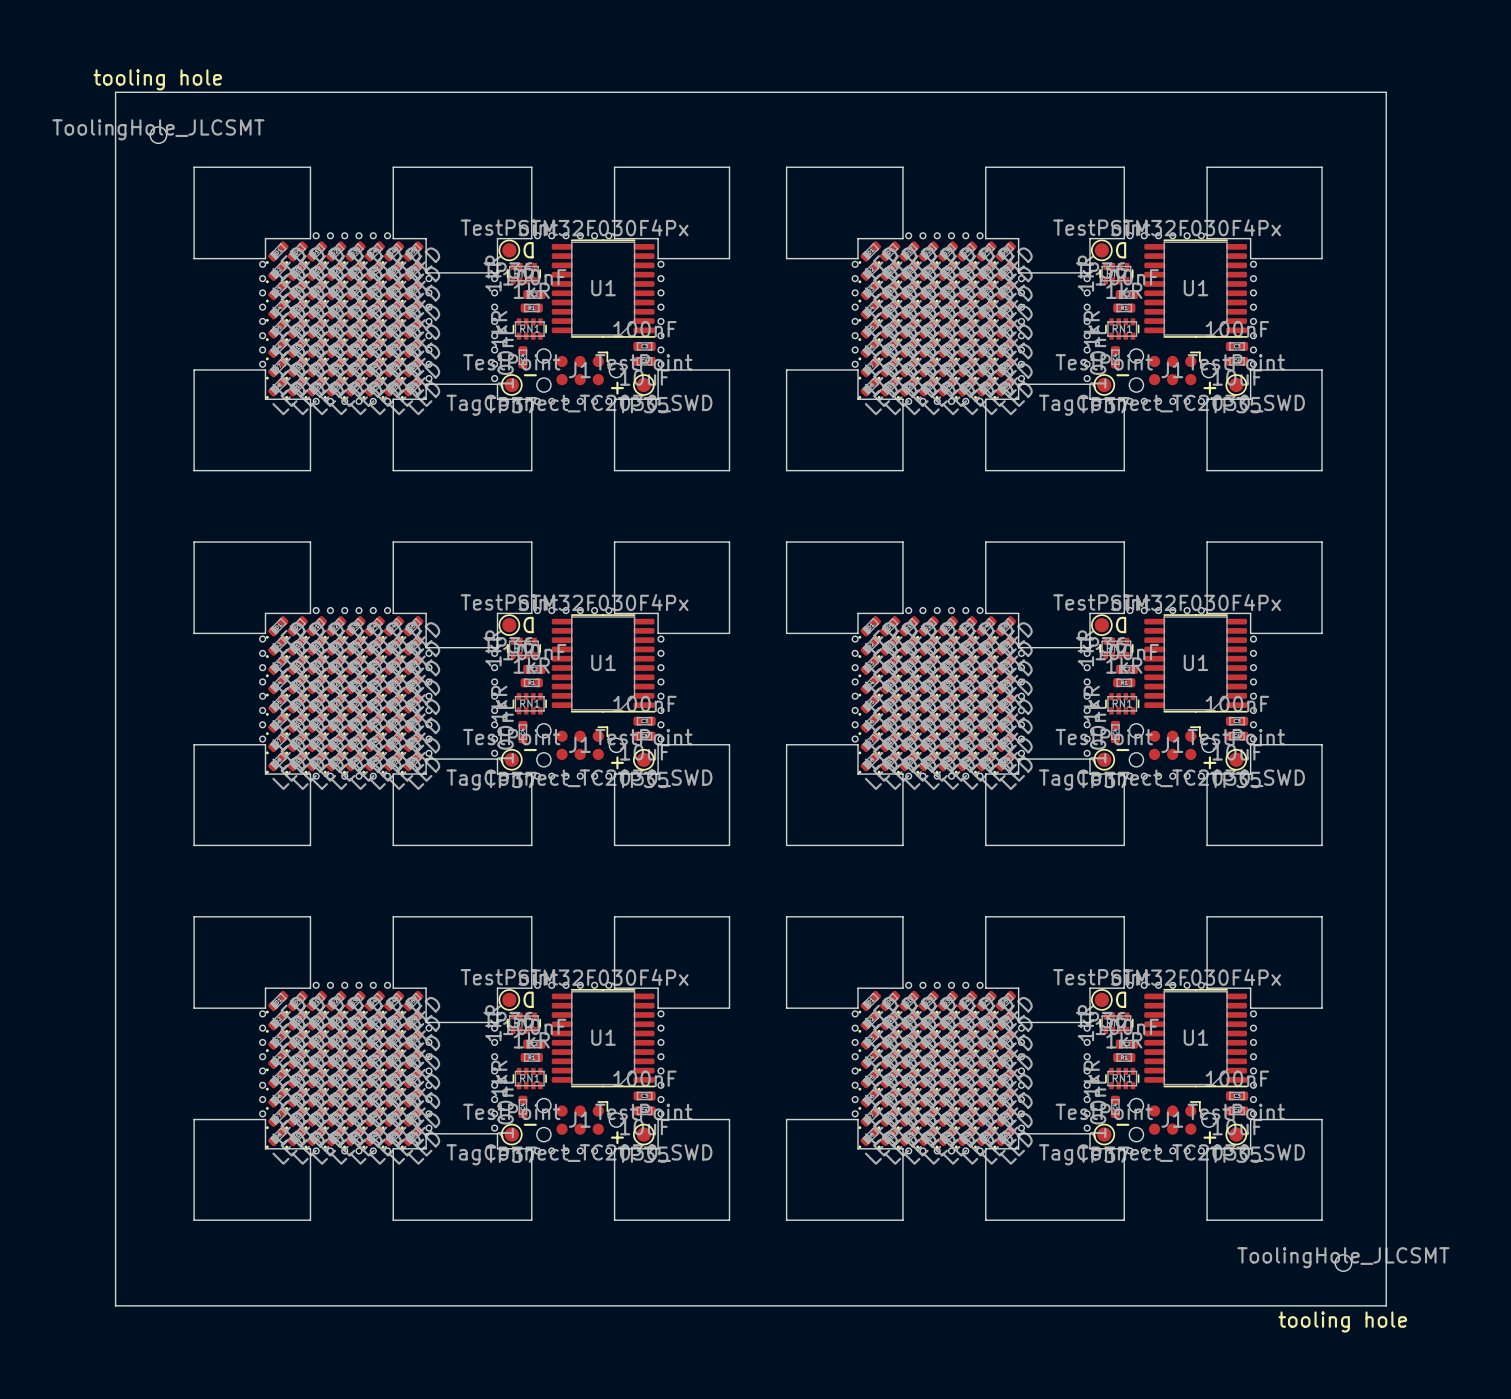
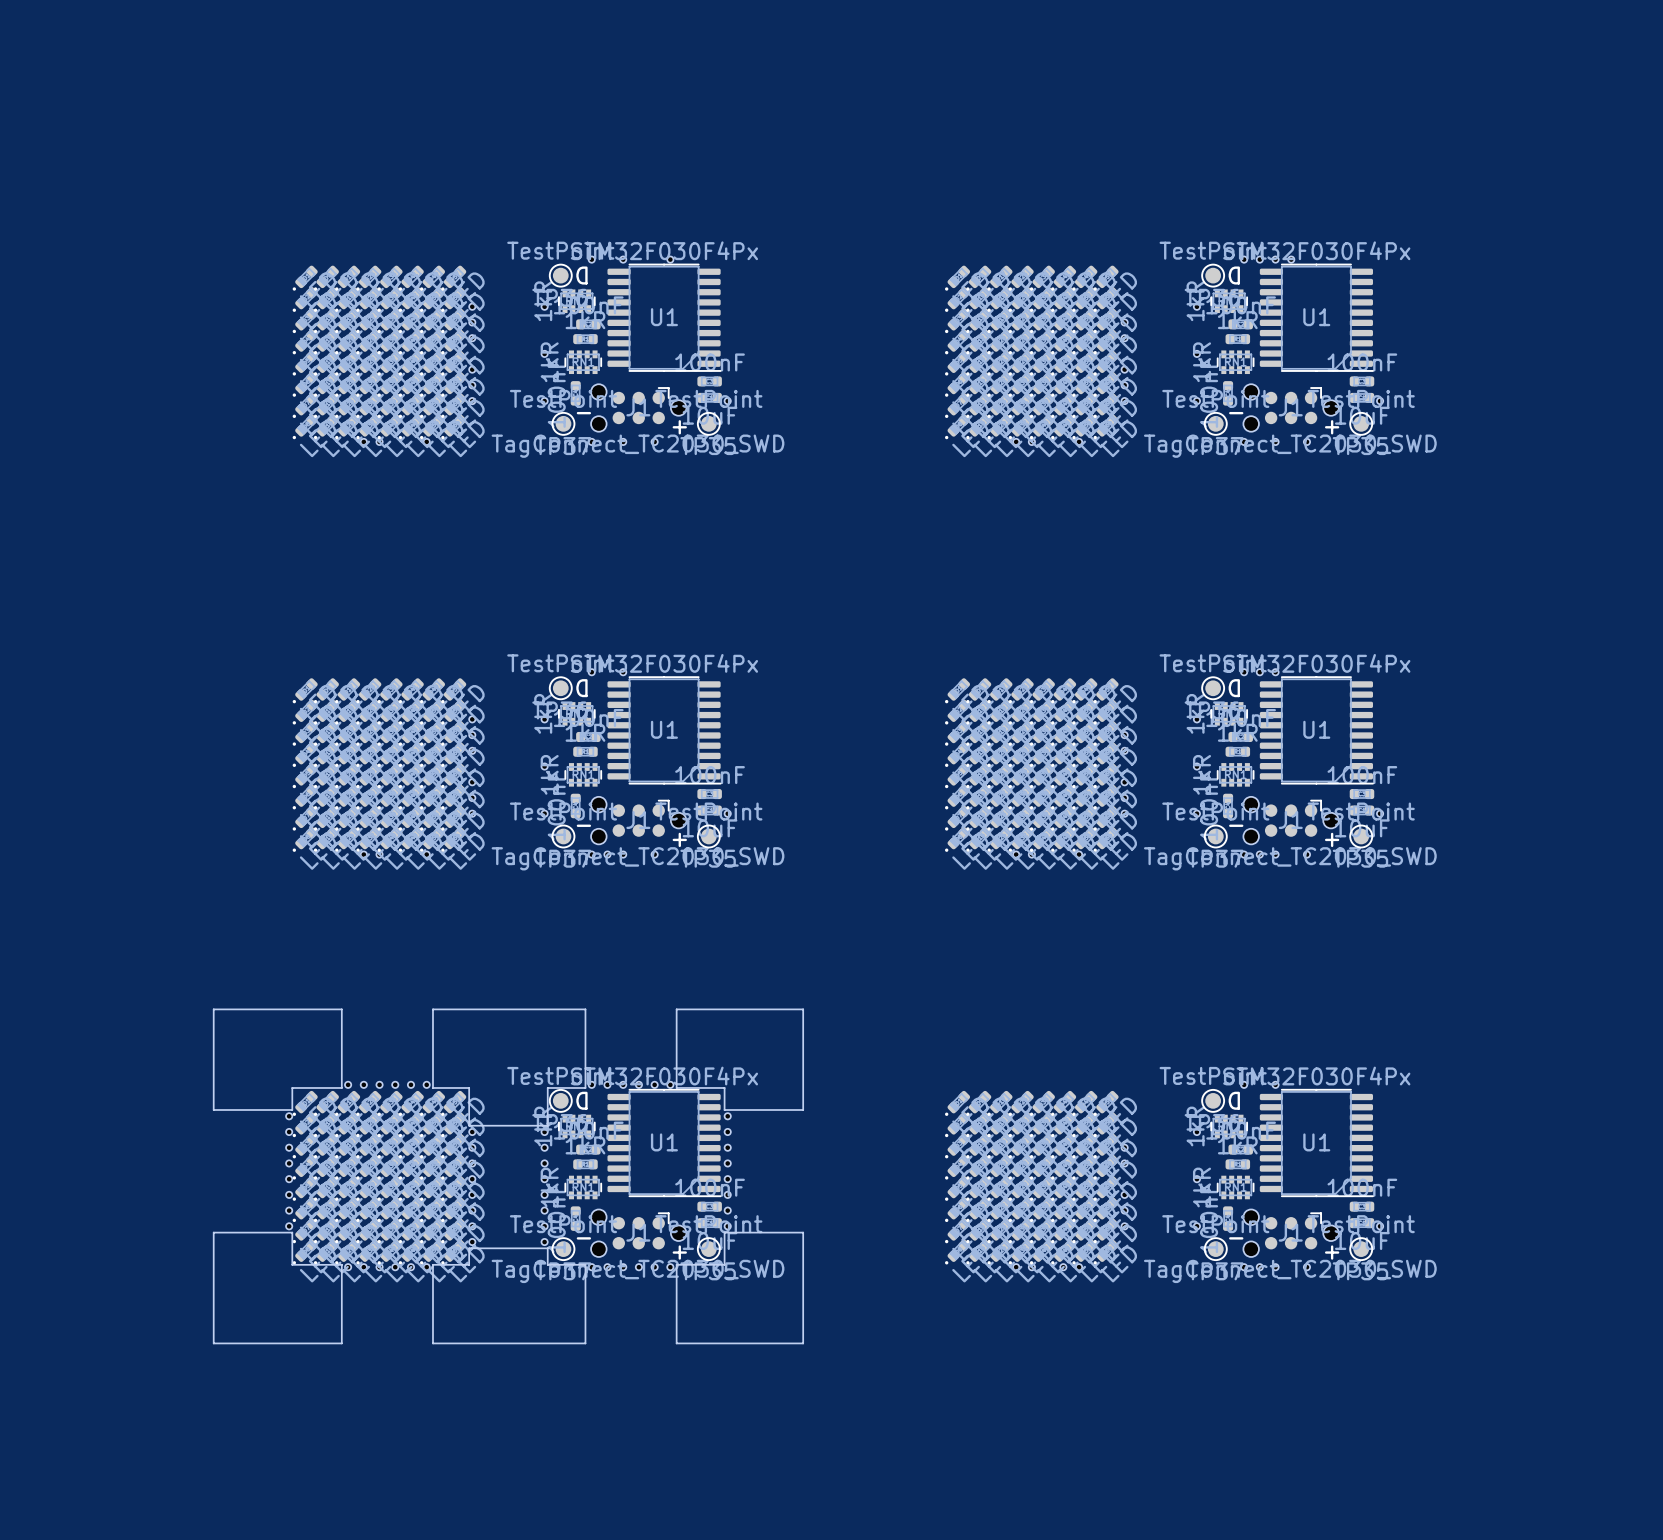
board edge: (115, 92) (115, 1305) (1386, 1305) (1386, 92) (115, 92) -> none
part: ToolingHole_JLCSMT (158, 135) -> none
board edge: (194, 167) (310, 167) (310, 238) (265, 238) (265, 258) (194, 258) (194, 167) -> none
board edge: (393, 167) (531, 167) (531, 238) (497, 238) (497, 272) (426, 272) (426, 238) (393, 238) (393, 167) -> none
board edge: (614, 167) (729, 167) (729, 258) (658, 258) (658, 238) (614, 238) (614, 167) -> none
board edge: (786, 167) (786, 258) (857, 258) (857, 238) (902, 238) (902, 167) (786, 167) -> none
board edge: (985, 167) (985, 238) (1018, 238) (1018, 272) (1090, 272) (1090, 238) (1124, 238) (1124, 167) (985, 167) -> none
board edge: (1207, 167) (1207, 238) (1250, 238) (1250, 258) (1322, 258) (1322, 167) (1207, 167) -> none
part: (316, 235) -> none
part: (330, 235) -> none
part: (344, 235) -> none
part: (359, 235) -> none
part: (373, 235) -> none
part: (387, 235) -> none
part: (551, 235) -> none
part: (580, 235) -> none
part: (594, 235) -> none
part: (908, 235) -> none
part: (922, 235) -> none
part: (937, 235) -> none
part: (951, 235) -> none
part: (965, 235) -> none
part: (980, 235) -> none
part: (1187, 235) -> none
part: (1201, 235) -> none
part: (262, 264) -> none
part: (660, 264) -> none
part: (855, 264) -> none
part: (1253, 264) -> none
part: (262, 278) -> none
part: (660, 278) -> none
part: (855, 278) -> none
part: (1021, 278) -> none
part: (1253, 278) -> none
part: (262, 292) -> none
part: (494, 292) -> none
part: (660, 292) -> none
part: (855, 292) -> none
part: (1087, 292) -> none
part: (1253, 292) -> none
part: (262, 307) -> none
part: (494, 307) -> none
part: (660, 307) -> none
part: (855, 307) -> none
part: (1087, 307) -> none
part: (1253, 307) -> none
part: (262, 321) -> none
part: (428, 321) -> none
part: (660, 321) -> none
part: (855, 321) -> none
part: (1021, 321) -> none
part: (1253, 321) -> none
part: (262, 335) -> none
part: (494, 335) -> none
part: (660, 335) -> none
part: (855, 335) -> none
part: (1087, 335) -> none
part: (1253, 335) -> none
part: (262, 349) -> none
part: (494, 349) -> none
part: (660, 349) -> none
part: (855, 349) -> none
part: (1087, 349) -> none
part: (1253, 349) -> none
part: (262, 364) -> none
part: (855, 364) -> none
board edge: (194, 369) (265, 369) (265, 399) (310, 399) (310, 470) (194, 470) (194, 369) -> none
board edge: (658, 369) (729, 369) (729, 470) (614, 470) (614, 399) (658, 399) (658, 369) -> none
board edge: (786, 369) (786, 470) (902, 470) (902, 399) (857, 399) (857, 369) (786, 369) -> none
board edge: (1250, 369) (1250, 399) (1207, 399) (1207, 470) (1322, 470) (1322, 369) (1250, 369) -> none
part: (428, 378) -> none
part: (494, 378) -> none
part: (1021, 378) -> none
part: (1087, 378) -> none
board edge: (426, 384) (497, 384) (497, 399) (531, 399) (531, 470) (393, 470) (393, 399) (426, 399) (426, 384) -> none
board edge: (1018, 384) (1018, 399) (985, 399) (985, 470) (1124, 470) (1124, 399) (1090, 399) (1090, 384) (1018, 384) -> none
part: (316, 401) -> none
part: (359, 401) -> none
part: (373, 401) -> none
part: (551, 401) -> none
part: (580, 401) -> none
part: (608, 401) -> none
part: (908, 401) -> none
part: (951, 401) -> none
part: (965, 401) -> none
part: (1144, 401) -> none
part: (1172, 401) -> none
part: (1201, 401) -> none
board edge: (194, 542) (310, 542) (310, 613) (265, 613) (265, 633) (194, 633) (194, 542) -> none
board edge: (393, 542) (531, 542) (531, 613) (497, 613) (497, 647) (426, 647) (426, 613) (393, 613) (393, 542) -> none
board edge: (614, 542) (729, 542) (729, 633) (658, 633) (658, 613) (614, 613) (614, 542) -> none
board edge: (786, 542) (786, 633) (857, 633) (857, 613) (902, 613) (902, 542) (786, 542) -> none
board edge: (985, 542) (985, 613) (1018, 613) (1018, 647) (1090, 647) (1090, 613) (1124, 613) (1124, 542) (985, 542) -> none
board edge: (1207, 542) (1207, 613) (1250, 613) (1250, 633) (1322, 633) (1322, 542) (1207, 542) -> none
part: (316, 610) -> none
part: (330, 610) -> none
part: (344, 610) -> none
part: (359, 610) -> none
part: (373, 610) -> none
part: (387, 610) -> none
part: (551, 610) -> none
part: (580, 610) -> none
part: (594, 610) -> none
part: (608, 610) -> none
part: (908, 610) -> none
part: (922, 610) -> none
part: (937, 610) -> none
part: (951, 610) -> none
part: (965, 610) -> none
part: (980, 610) -> none
part: (1172, 610) -> none
part: (1187, 610) -> none
part: (1201, 610) -> none
part: (262, 639) -> none
part: (660, 639) -> none
part: (855, 639) -> none
part: (1253, 639) -> none
part: (262, 653) -> none
part: (660, 653) -> none
part: (855, 653) -> none
part: (1021, 653) -> none
part: (1253, 653) -> none
part: (262, 667) -> none
part: (494, 667) -> none
part: (660, 667) -> none
part: (855, 667) -> none
part: (1087, 667) -> none
part: (1253, 667) -> none
part: (262, 681) -> none
part: (494, 681) -> none
part: (660, 681) -> none
part: (855, 681) -> none
part: (1087, 681) -> none
part: (1253, 681) -> none
part: (262, 696) -> none
part: (428, 696) -> none
part: (660, 696) -> none
part: (855, 696) -> none
part: (1021, 696) -> none
part: (1253, 696) -> none
part: (262, 710) -> none
part: (494, 710) -> none
part: (660, 710) -> none
part: (855, 710) -> none
part: (1087, 710) -> none
part: (1253, 710) -> none
part: (262, 724) -> none
part: (494, 724) -> none
part: (660, 724) -> none
part: (855, 724) -> none
part: (1087, 724) -> none
part: (1253, 724) -> none
part: (262, 739) -> none
part: (855, 739) -> none
board edge: (194, 744) (265, 744) (265, 774) (310, 774) (310, 845) (194, 845) (194, 744) -> none
board edge: (658, 744) (729, 744) (729, 845) (614, 845) (614, 774) (658, 774) (658, 744) -> none
board edge: (786, 744) (786, 845) (902, 845) (902, 774) (857, 774) (857, 744) (786, 744) -> none
board edge: (1250, 744) (1250, 774) (1207, 774) (1207, 845) (1322, 845) (1322, 744) (1250, 744) -> none
part: (428, 753) -> none
part: (494, 753) -> none
part: (1021, 753) -> none
part: (1087, 753) -> none
board edge: (426, 759) (497, 759) (497, 774) (531, 774) (531, 845) (393, 845) (393, 774) (426, 774) (426, 759) -> none
board edge: (1018, 759) (1018, 774) (985, 774) (985, 845) (1124, 845) (1124, 774) (1090, 774) (1090, 759) (1018, 759) -> none
part: (316, 776) -> none
part: (359, 776) -> none
part: (373, 776) -> none
part: (580, 776) -> none
part: (608, 776) -> none
part: (908, 776) -> none
part: (951, 776) -> none
part: (965, 776) -> none
part: (1172, 776) -> none
part: (1201, 776) -> none
board edge: (786, 916) (786, 1008) (857, 1008) (857, 988) (902, 988) (902, 916) (786, 916) -> none
board edge: (985, 916) (985, 988) (1018, 988) (1018, 1022) (1090, 1022) (1090, 988) (1124, 988) (1124, 916) (985, 916) -> none
board edge: (1207, 916) (1207, 988) (1250, 988) (1250, 1008) (1322, 1008) (1322, 916) (1207, 916) -> none
part: (908, 985) -> none
part: (922, 985) -> none
part: (937, 985) -> none
part: (951, 985) -> none
part: (965, 985) -> none
part: (980, 985) -> none
part: (1144, 985) -> none
part: (1172, 985) -> none
part: (1187, 985) -> none
part: (1201, 985) -> none
part: (855, 1013) -> none
part: (1253, 1013) -> none
part: (855, 1028) -> none
part: (1021, 1028) -> none
part: (1253, 1028) -> none
part: (855, 1042) -> none
part: (1087, 1042) -> none
part: (1253, 1042) -> none
part: (855, 1056) -> none
part: (1087, 1056) -> none
part: (1253, 1056) -> none
part: (855, 1070) -> none
part: (1021, 1070) -> none
part: (1253, 1070) -> none
part: (855, 1085) -> none
part: (1087, 1085) -> none
part: (1253, 1085) -> none
part: (855, 1099) -> none
part: (1087, 1099) -> none
part: (1253, 1099) -> none
part: (855, 1113) -> none
board edge: (786, 1119) (786, 1220) (902, 1220) (902, 1148) (857, 1148) (857, 1119) (786, 1119) -> none
board edge: (1250, 1119) (1322, 1119) (1322, 1220) (1207, 1220) (1207, 1148) (1250, 1148) (1250, 1119) -> none
part: (1021, 1128) -> none
part: (1087, 1128) -> none
board edge: (1018, 1133) (1018, 1148) (985, 1148) (985, 1220) (1124, 1220) (1124, 1148) (1090, 1148) (1090, 1133) (1018, 1133) -> none
part: (908, 1150) -> none
part: (951, 1150) -> none
part: (1172, 1150) -> none
part: (1201, 1150) -> none
part: ToolingHole_JLCSMT (1343, 1263) -> none

